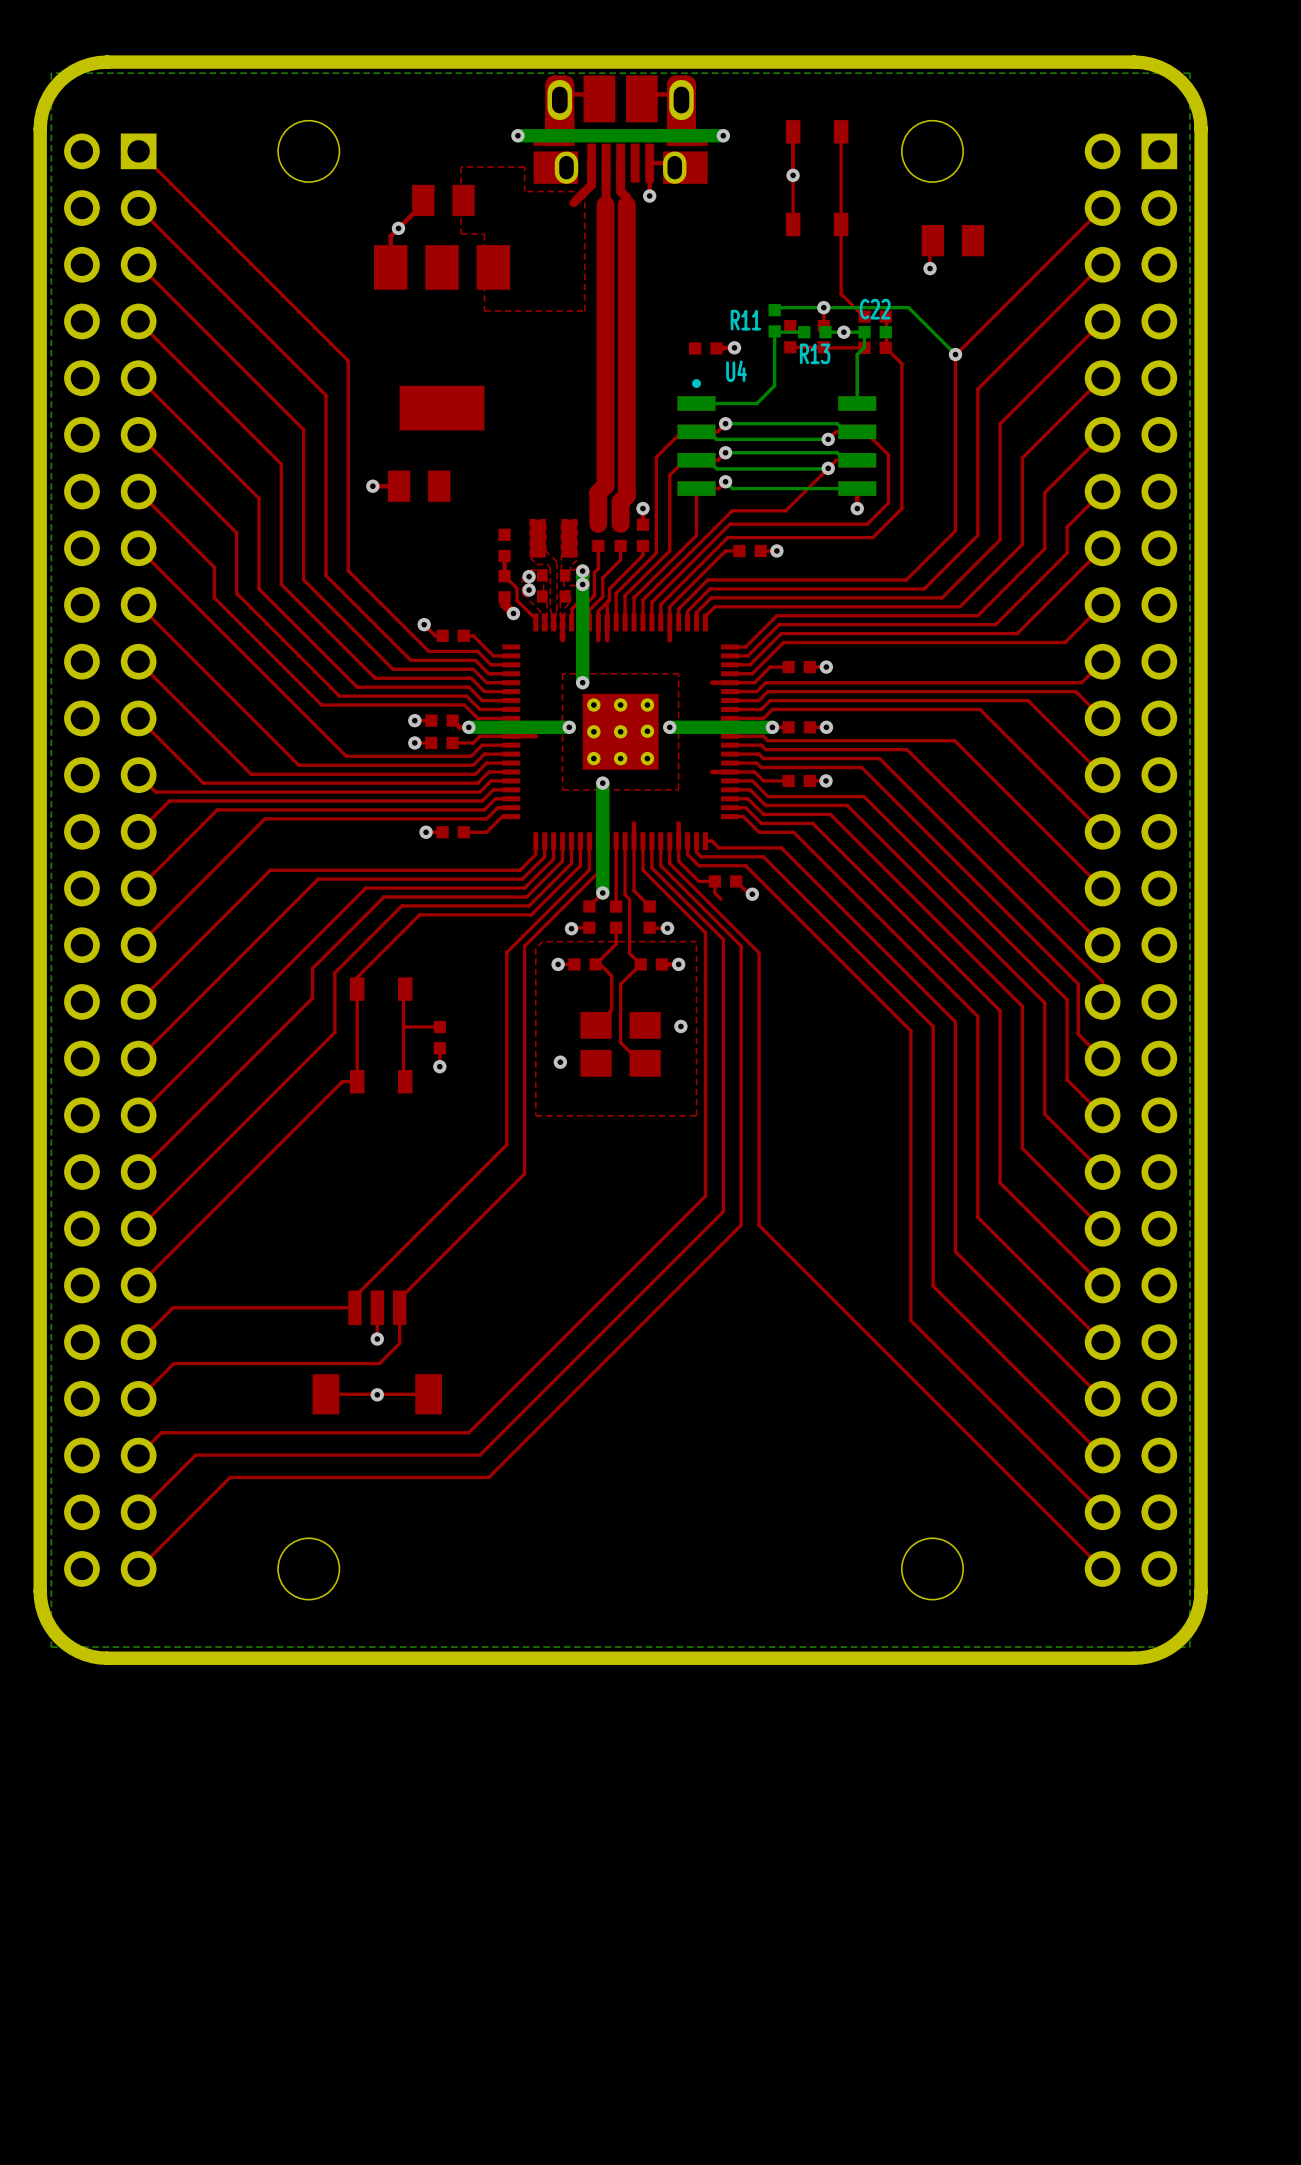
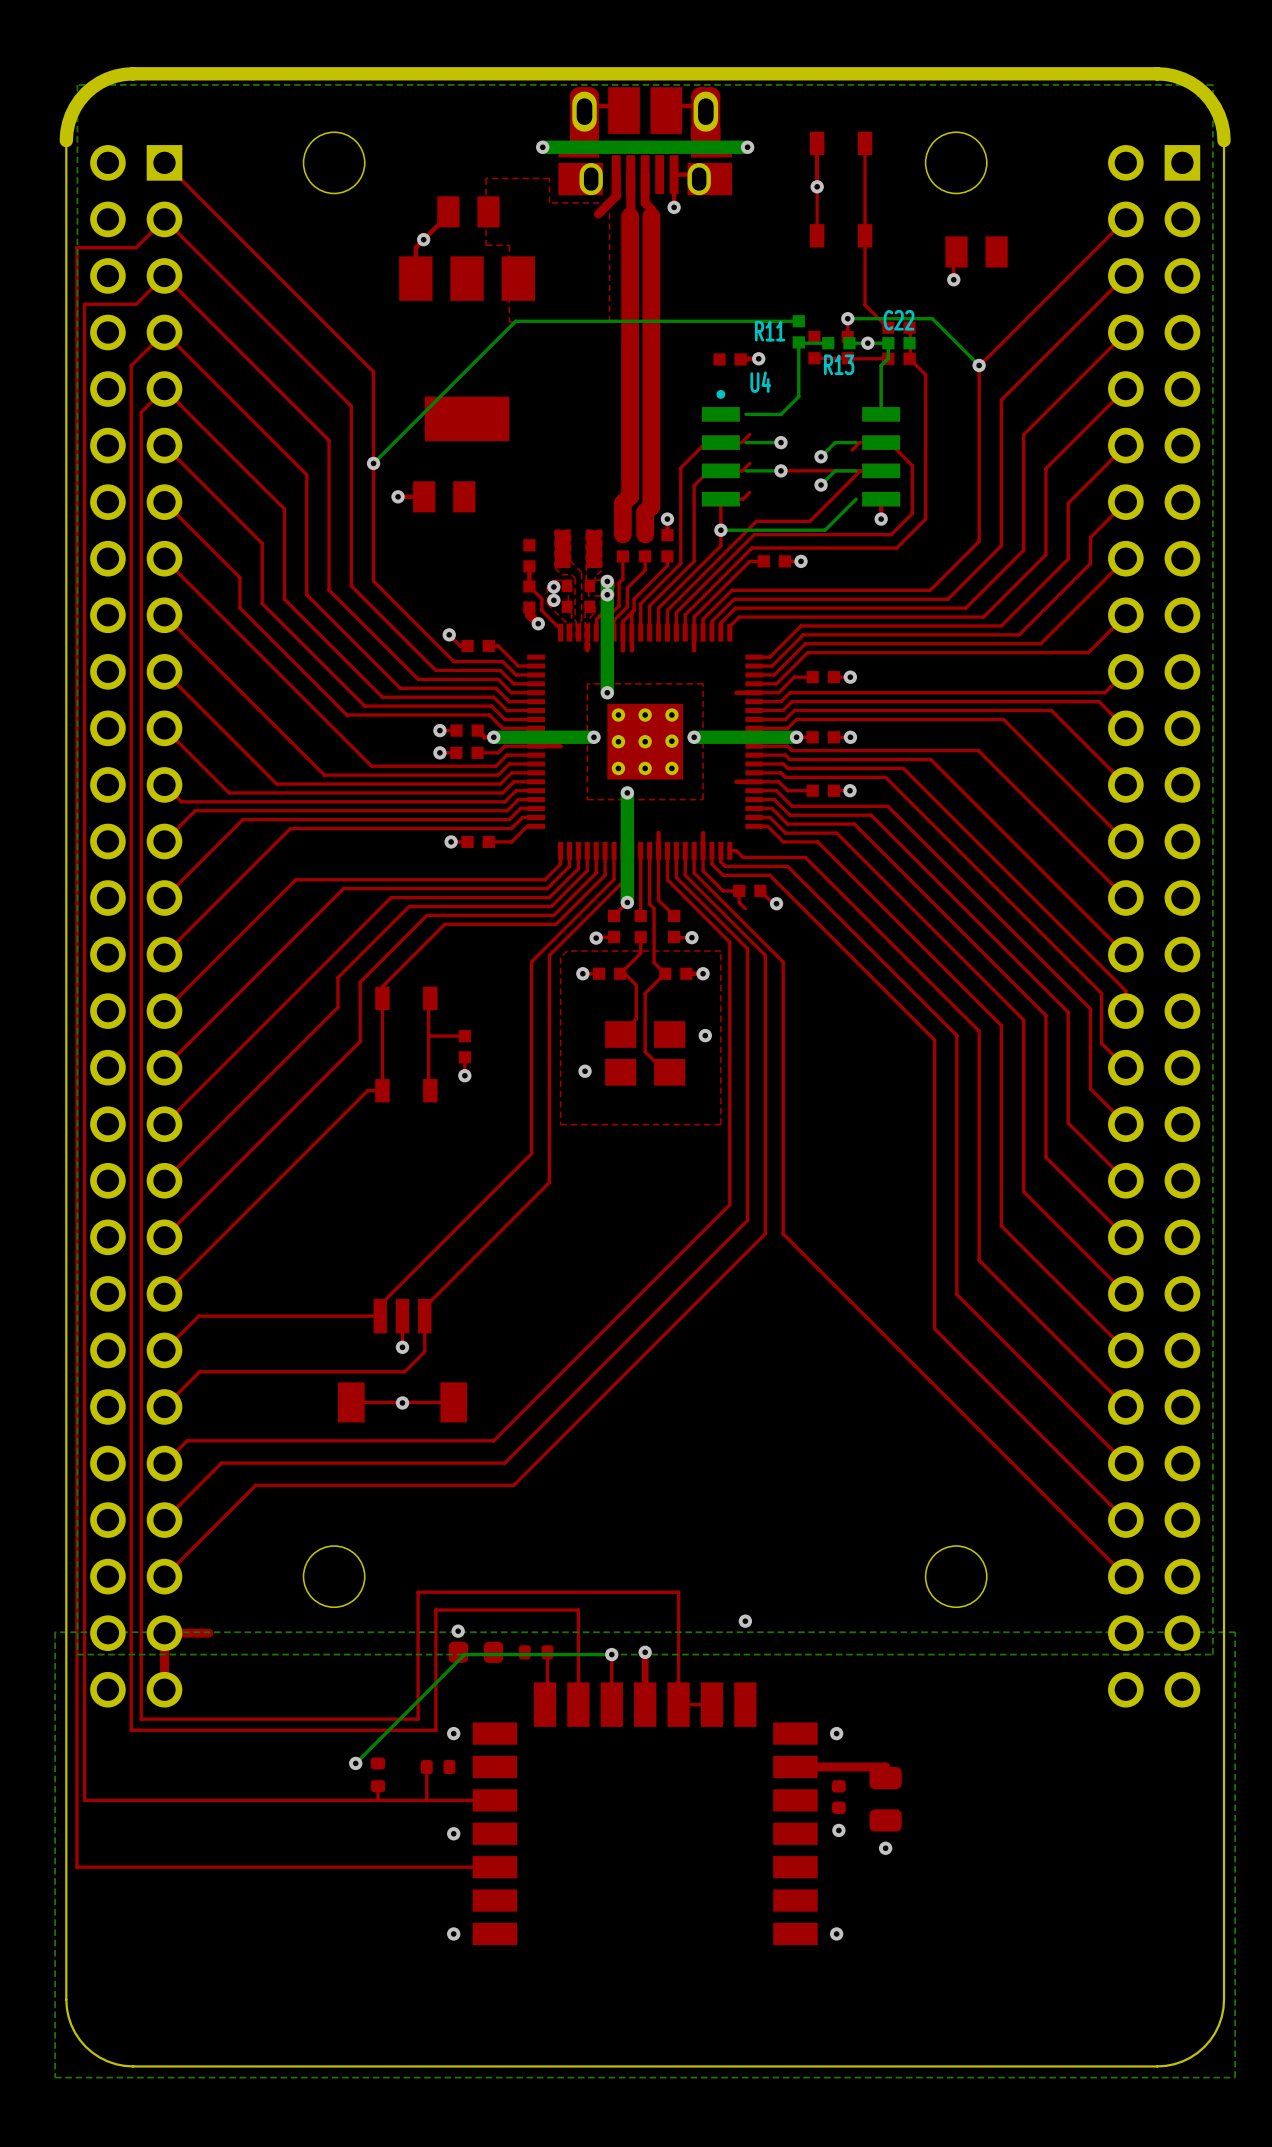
board edge width: thick (40, 129) (40, 1591) -> thin (66, 140) (66, 1598)
board edge width: thick (1201, 129) (1201, 1591) -> thin (1224, 140) (1224, 1598)
top track: none -> (164, 219) (136, 247) (76, 247) (76, 1867) (494, 1867)
top track: none -> (164, 275) (136, 304) (84, 304) (84, 1800) (494, 1800)
bottom track: (823, 307) (776, 307) (774, 309) -> (373, 463) (515, 321) (798, 321)
top track: none -> (164, 332) (131, 365) (131, 1730) (435, 1730) (435, 1610) (578, 1610) (578, 1704)
top track: none -> (164, 389) (141, 412) (141, 1719) (418, 1719) (418, 1592) (678, 1592) (678, 1704) (711, 1704)
bottom track: (756, 403) (696, 403) -> (781, 414) (745, 414)
bottom track: (725, 423) (837, 423) (845, 431) (857, 431) -> none
via: (725, 423) -> none
bottom track: (696, 431) (709, 432) (716, 439) (828, 439) -> none
bottom track: none -> (780, 442) (745, 442)
via: none -> (780, 442)
bottom track: none -> (856, 442) (835, 442) (821, 456)
via: (828, 439) -> none
via: none -> (821, 456)
via: none -> (373, 463)
bottom track: (725, 452) (837, 452) (844, 460) (857, 460) -> none
via: (725, 452) -> none
bottom track: (696, 460) (708, 460) (716, 468) (828, 468) -> none
bottom track: none -> (780, 470) (745, 470)
via: none -> (780, 470)
bottom track: none -> (856, 470) (835, 470) (821, 485)
top track: none -> (860, 470) (780, 470)
via: (828, 468) -> none
via: none -> (821, 485)
bottom track: (725, 481) (732, 488) (857, 488) -> none
via: (725, 481) -> none
bottom track: none -> (856, 499) (825, 530) (720, 530)
via: none -> (720, 530)
board edge: (1201, 1591) (1197, 1613) (1190, 1626) (1181, 1638) (1163, 1651) (1148, 1656) (1134, 1658) (99, 1657) (85, 1654) (71, 1647) (54, 1633) (43, 1613) (40, 1591) -> (1224, 1598) (1223, 2008) (1215, 2033) (1197, 2052) (1182, 2061) (1157, 2066) (133, 2066) (107, 2061) (92, 2052) (80, 2040) (71, 2025) (66, 2008) (66, 1598)
via: none -> (745, 1621)
via: none -> (458, 1631)
bottom zone outline: none -> (1235, 1632) (55, 1632) (55, 2077) (1235, 2077) (1235, 1632)
top track: none -> (208, 1633) (164, 1633) (164, 1689)
part: none -> (475, 1652)
part: none -> (536, 1652)
top track: none -> (547, 1652) (547, 1704)
top track: none -> (645, 1652) (645, 1704)
via: none -> (645, 1652)
top track: none -> (611, 1654) (611, 1704)
bottom track: none -> (611, 1654) (464, 1654) (355, 1763)
via: none -> (611, 1654)
part: none -> (136, 1661)
part: none -> (1154, 1661)
via: none -> (453, 1733)
via: none -> (836, 1733)
via: none -> (355, 1763)
top track: none -> (426, 1766) (426, 1800)
part: none -> (438, 1766)
top track: none -> (795, 1766) (885, 1766) (885, 1778)
part: none -> (378, 1774)
top track: none -> (378, 1786) (378, 1800)
part: none -> (838, 1797)
part: none -> (885, 1799)
part: none -> (645, 1813)
via: none -> (838, 1830)
via: none -> (453, 1833)
via: none -> (885, 1848)
via: none -> (453, 1933)
via: none -> (836, 1933)

